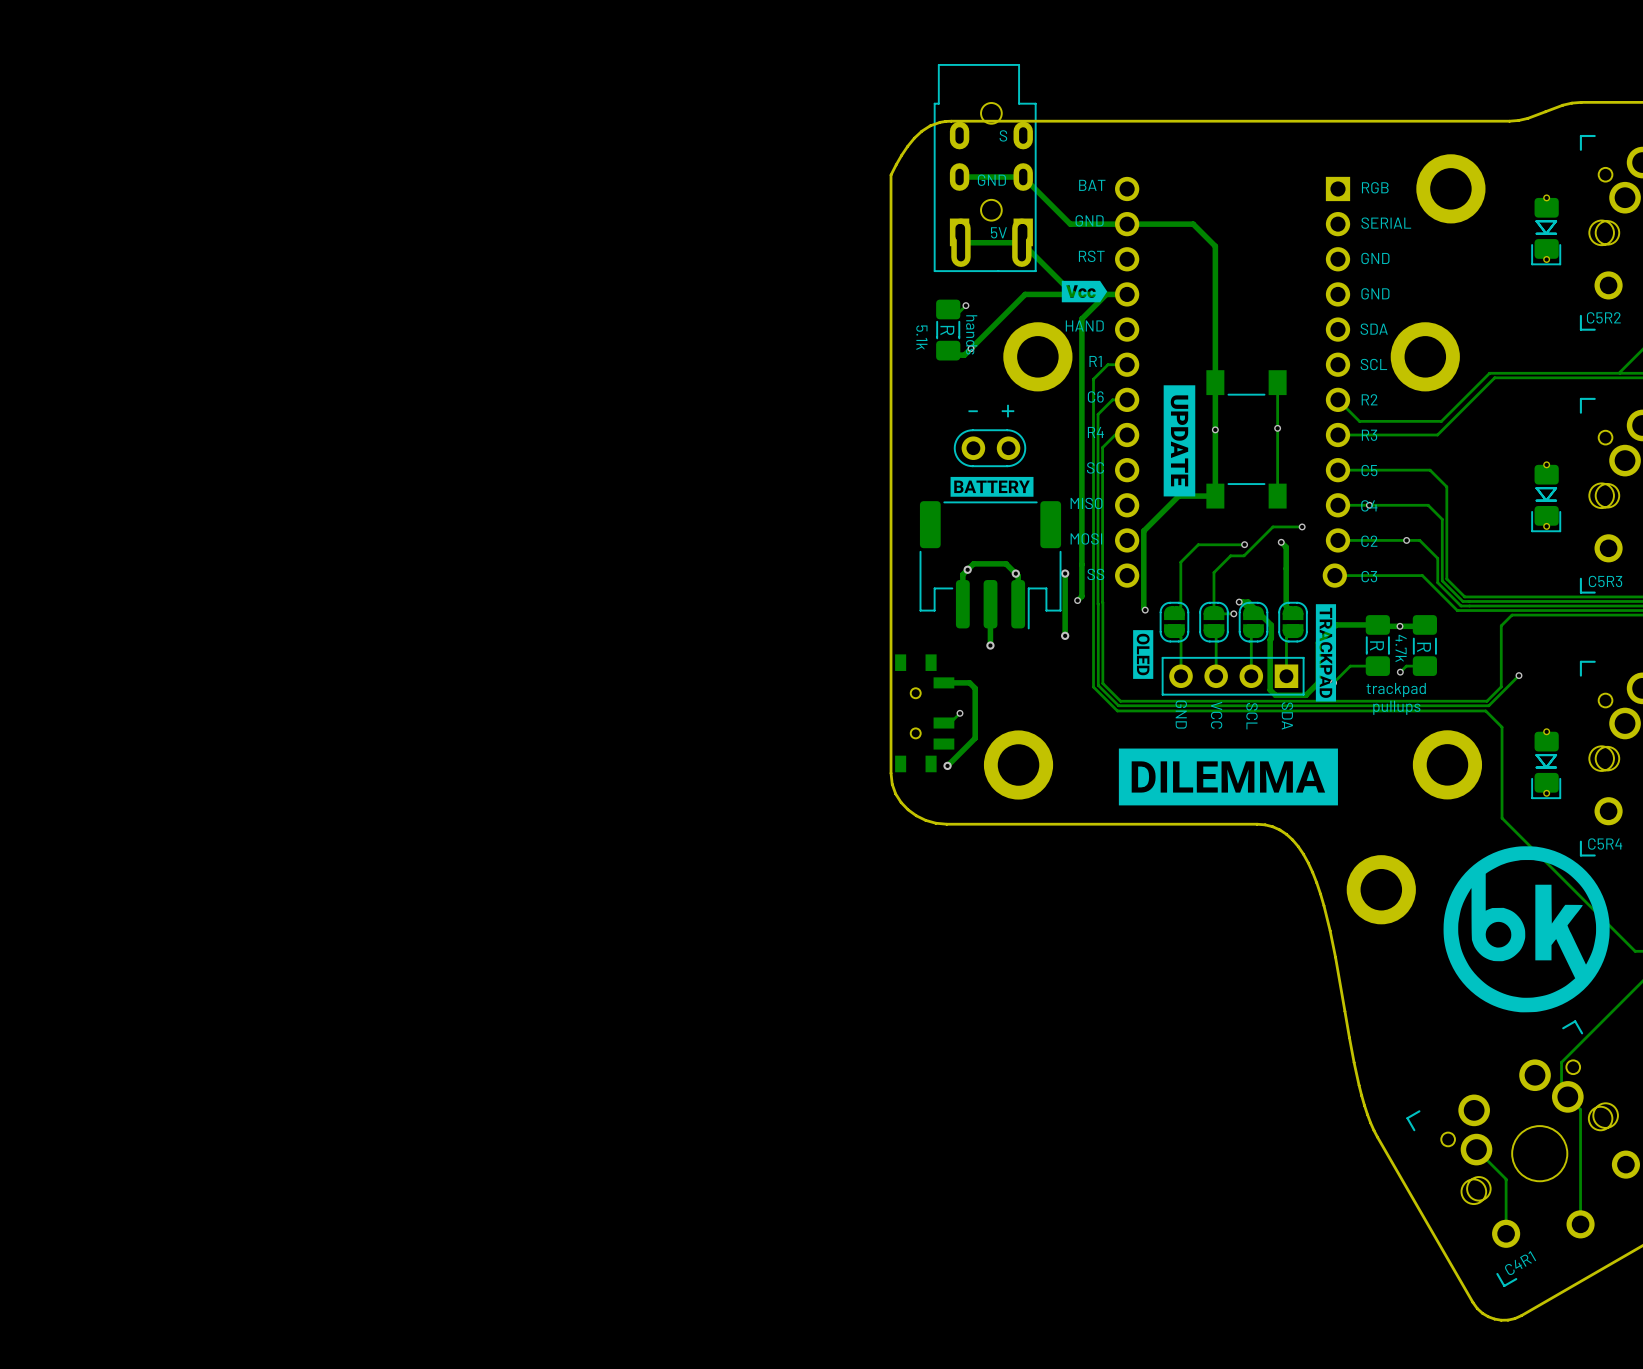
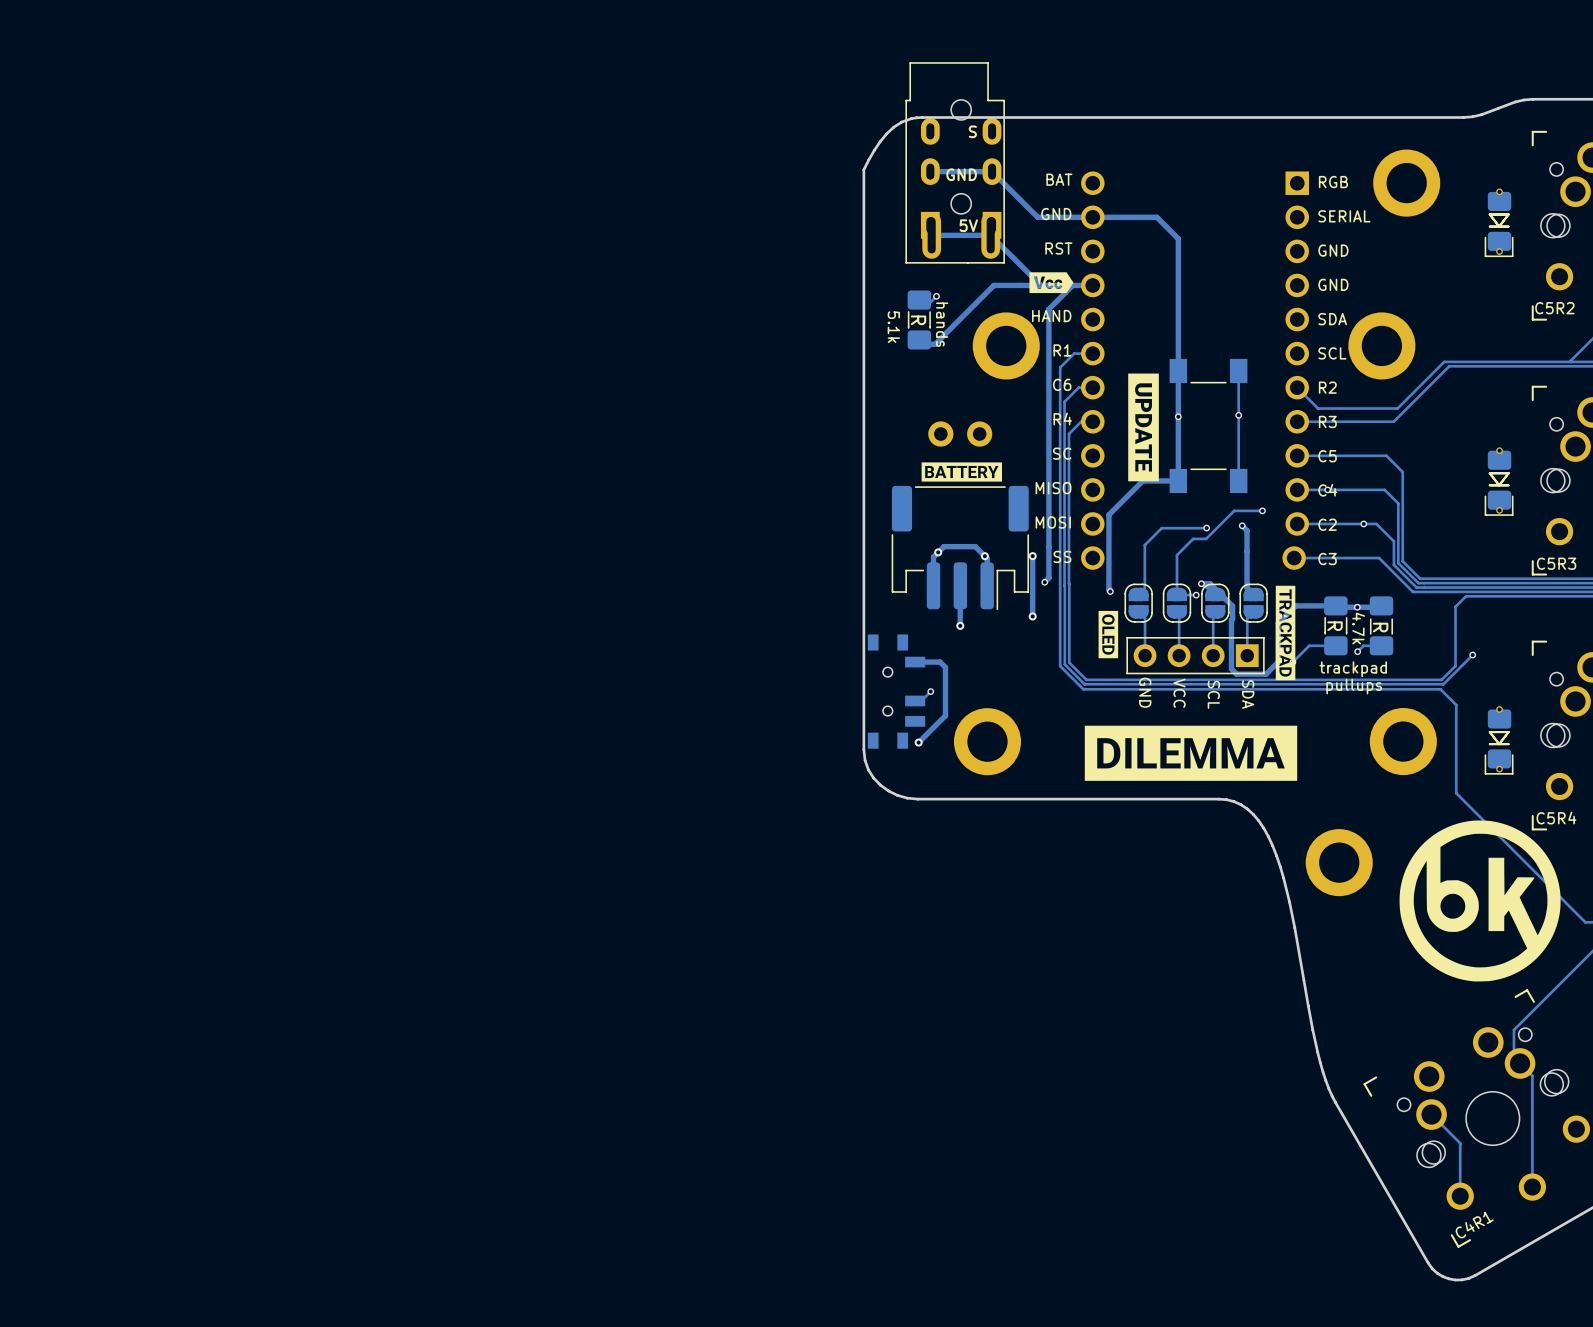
via: (971, 348) -> none
part footprint: [953, 429, 1027, 468] -> [928, 421, 993, 447]

